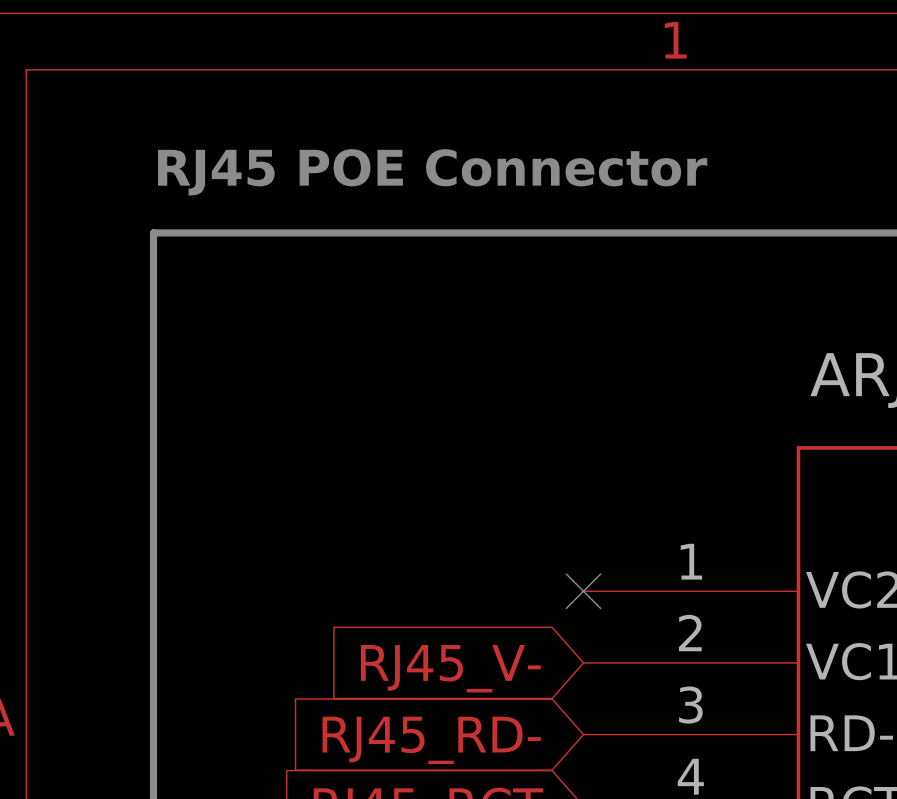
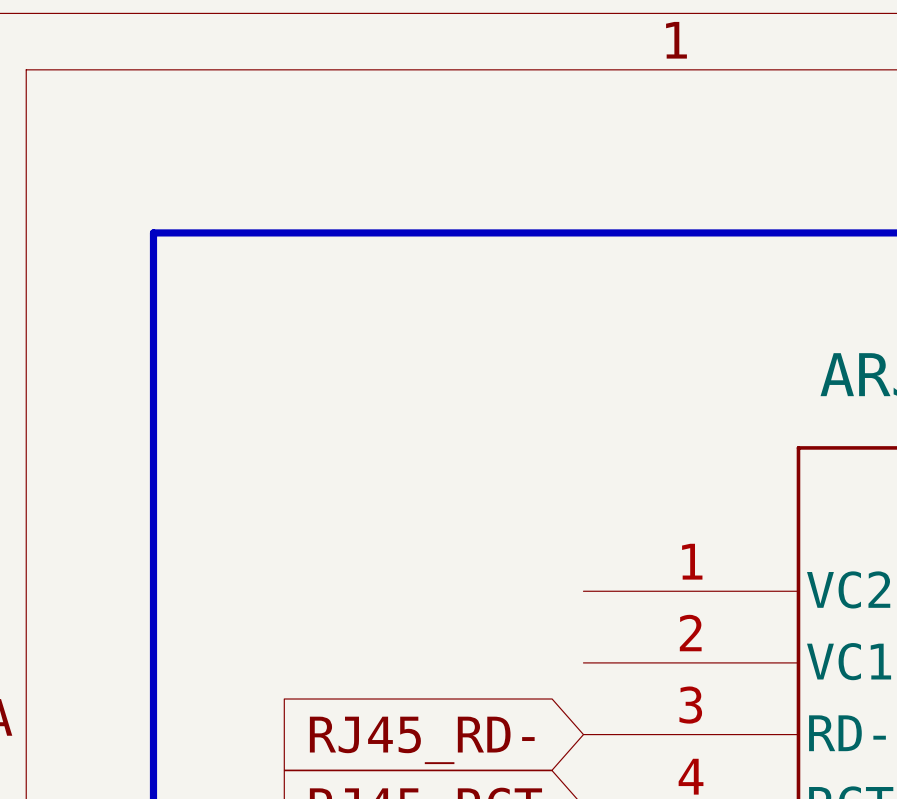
text: RJ45 POE Connector (432, 172) -> none
no-connect mark: (583, 591) -> none
global label: RJ45_V- (450, 668) -> none

